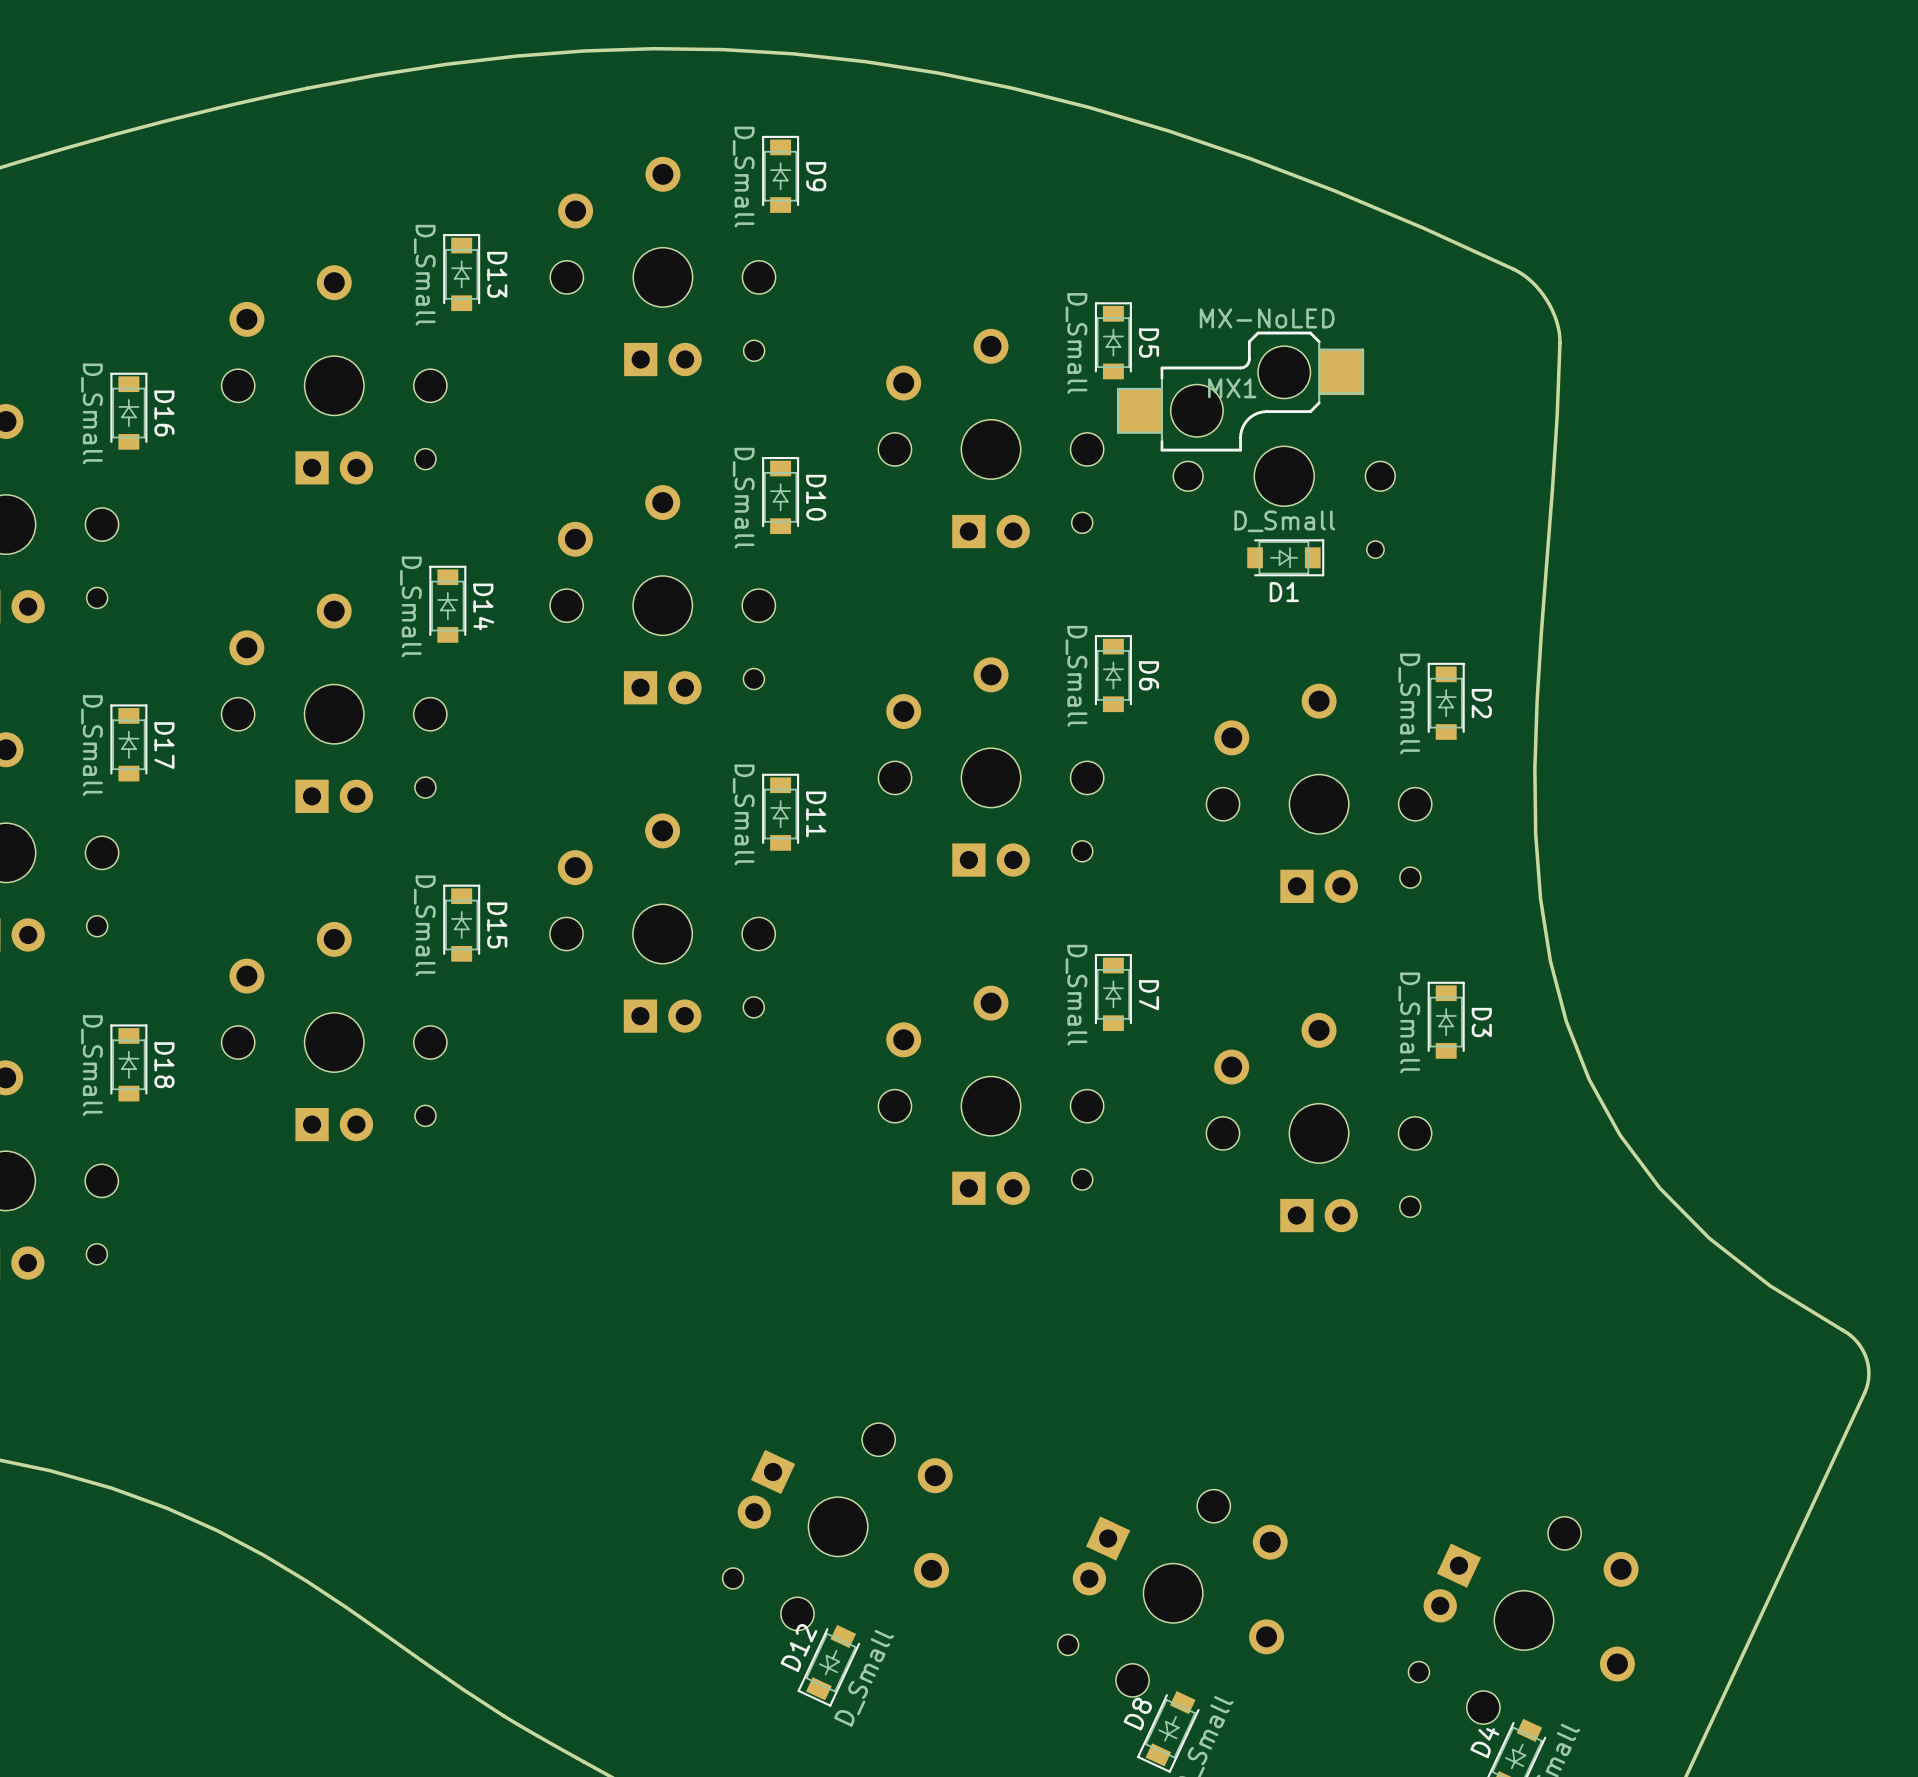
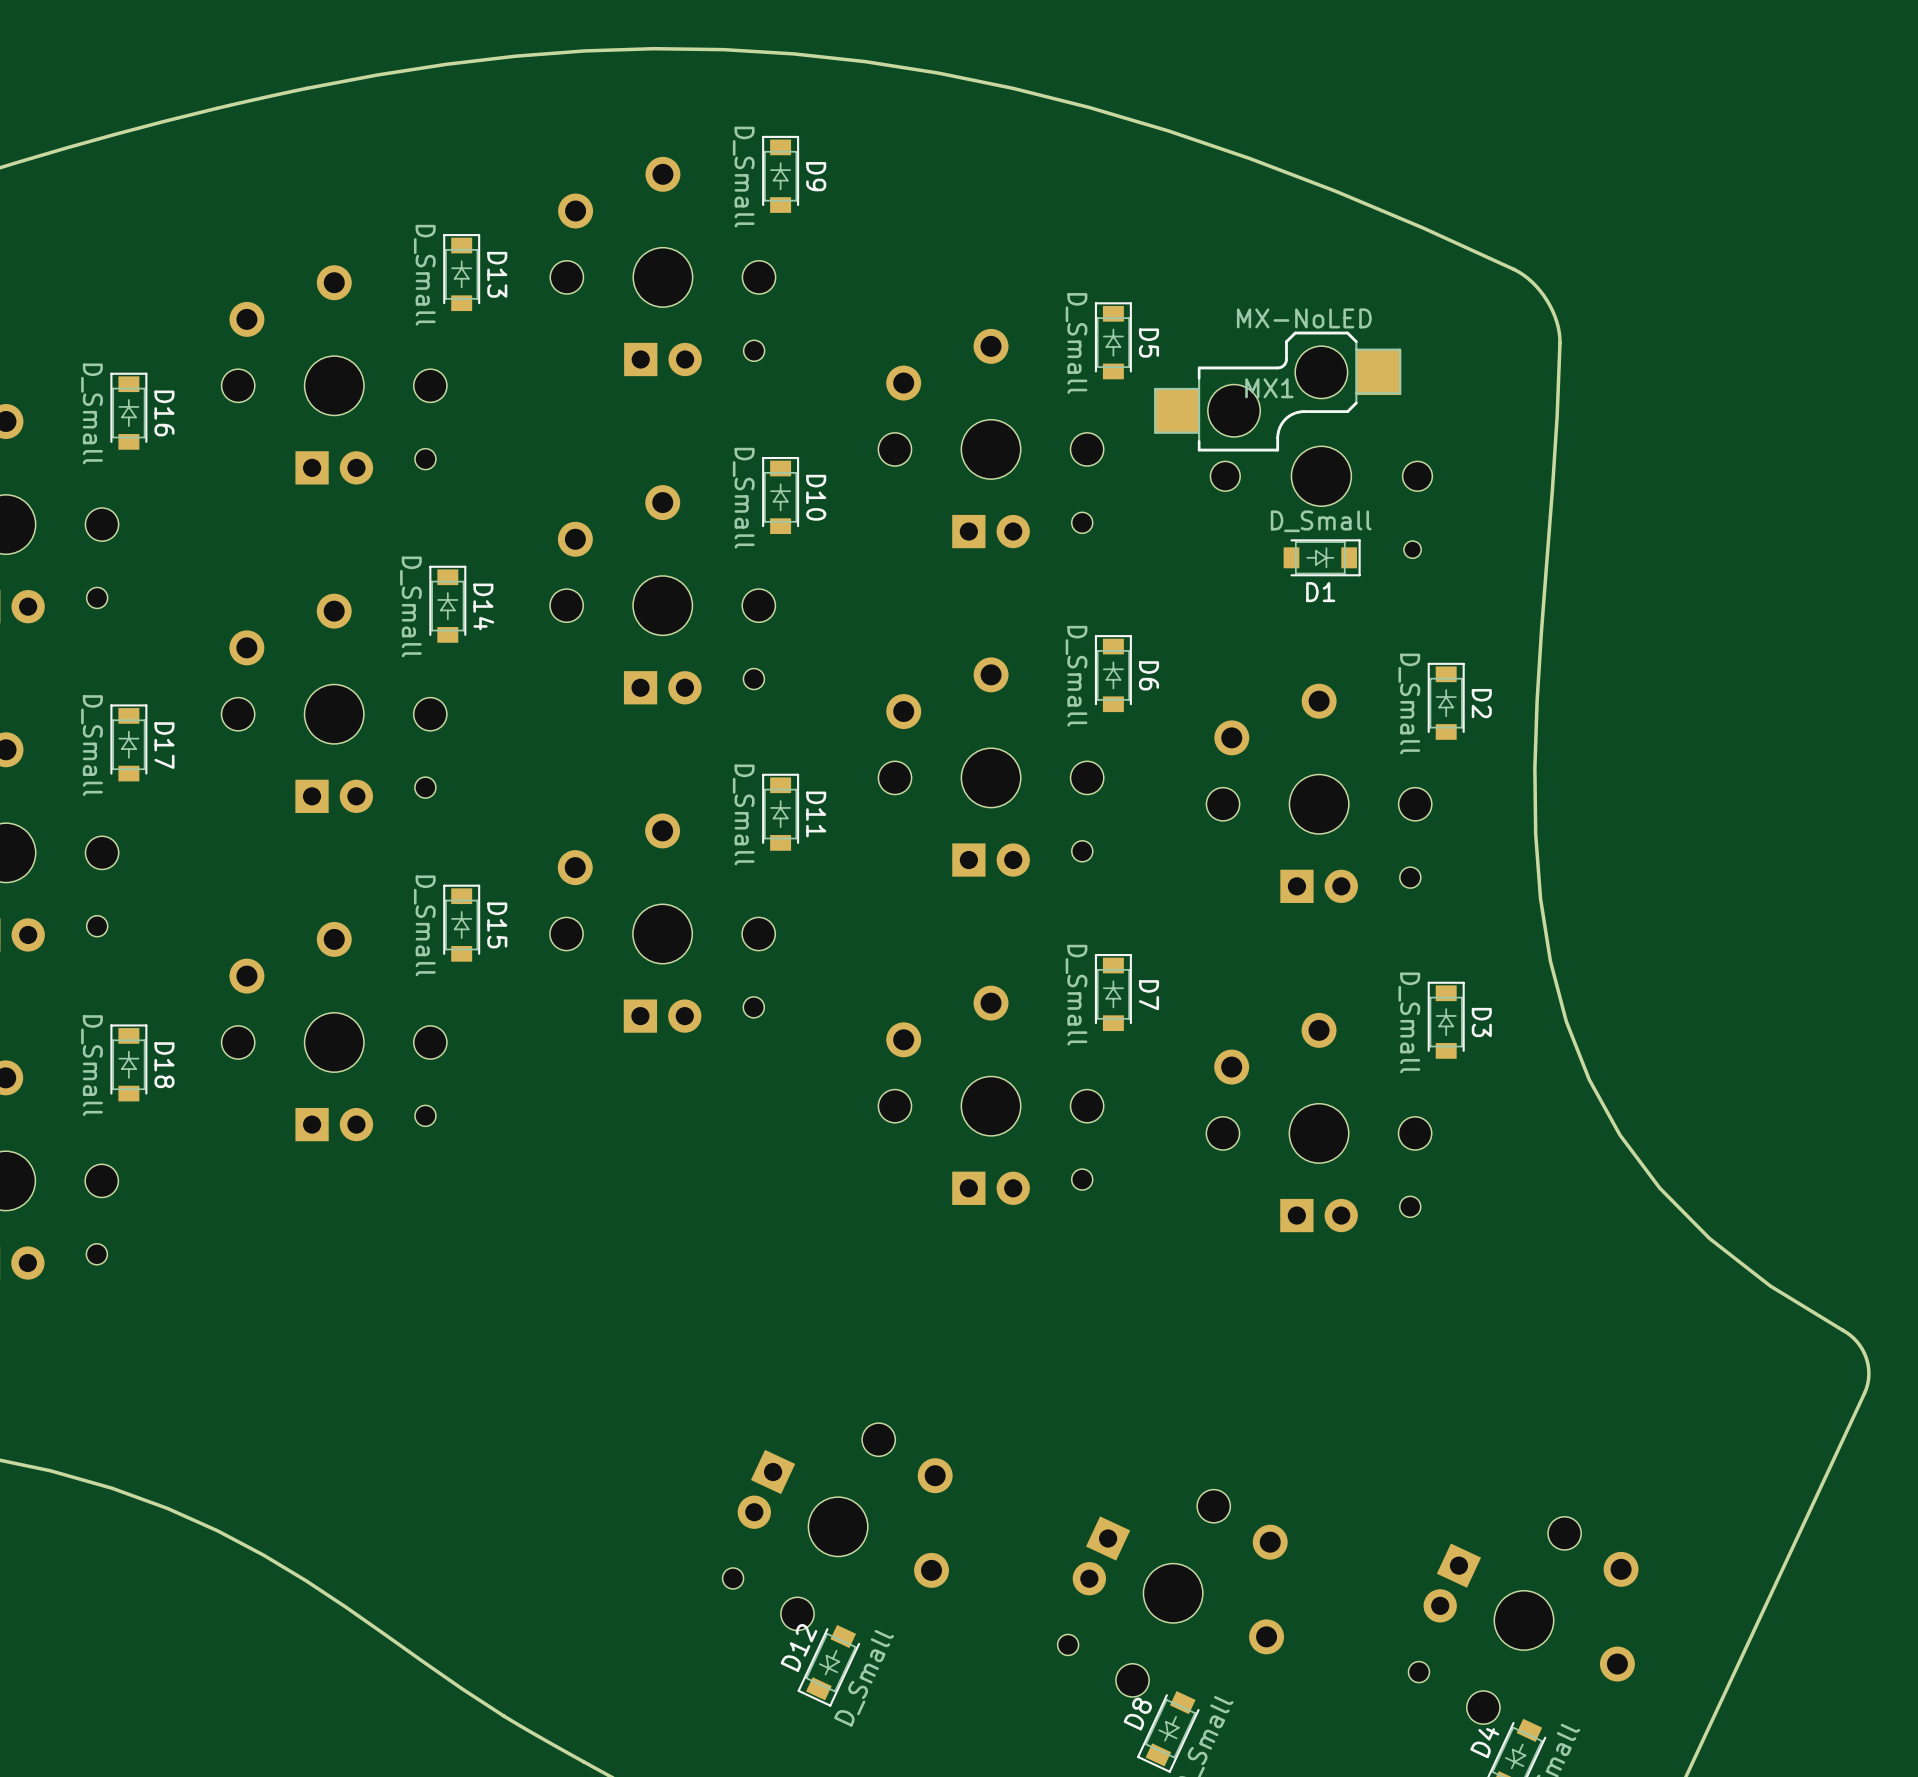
MX1 position: (1256, 445) -> (1293, 445)
D1 position: (1285, 557) -> (1322, 557)

